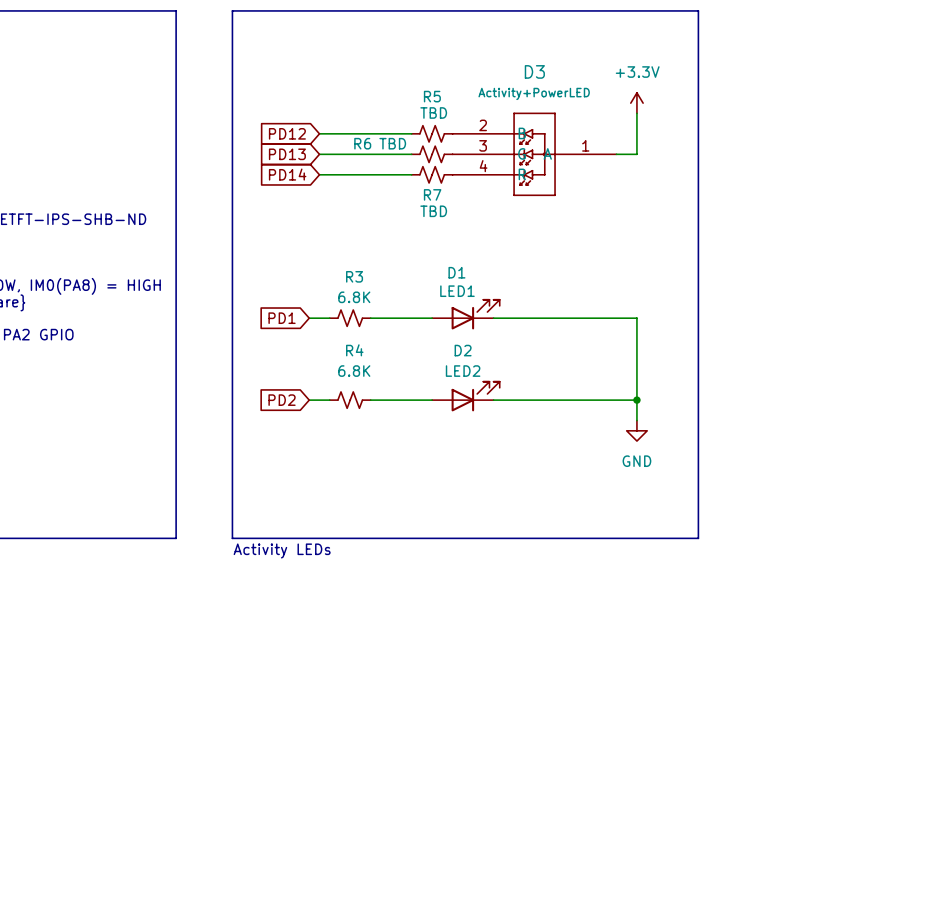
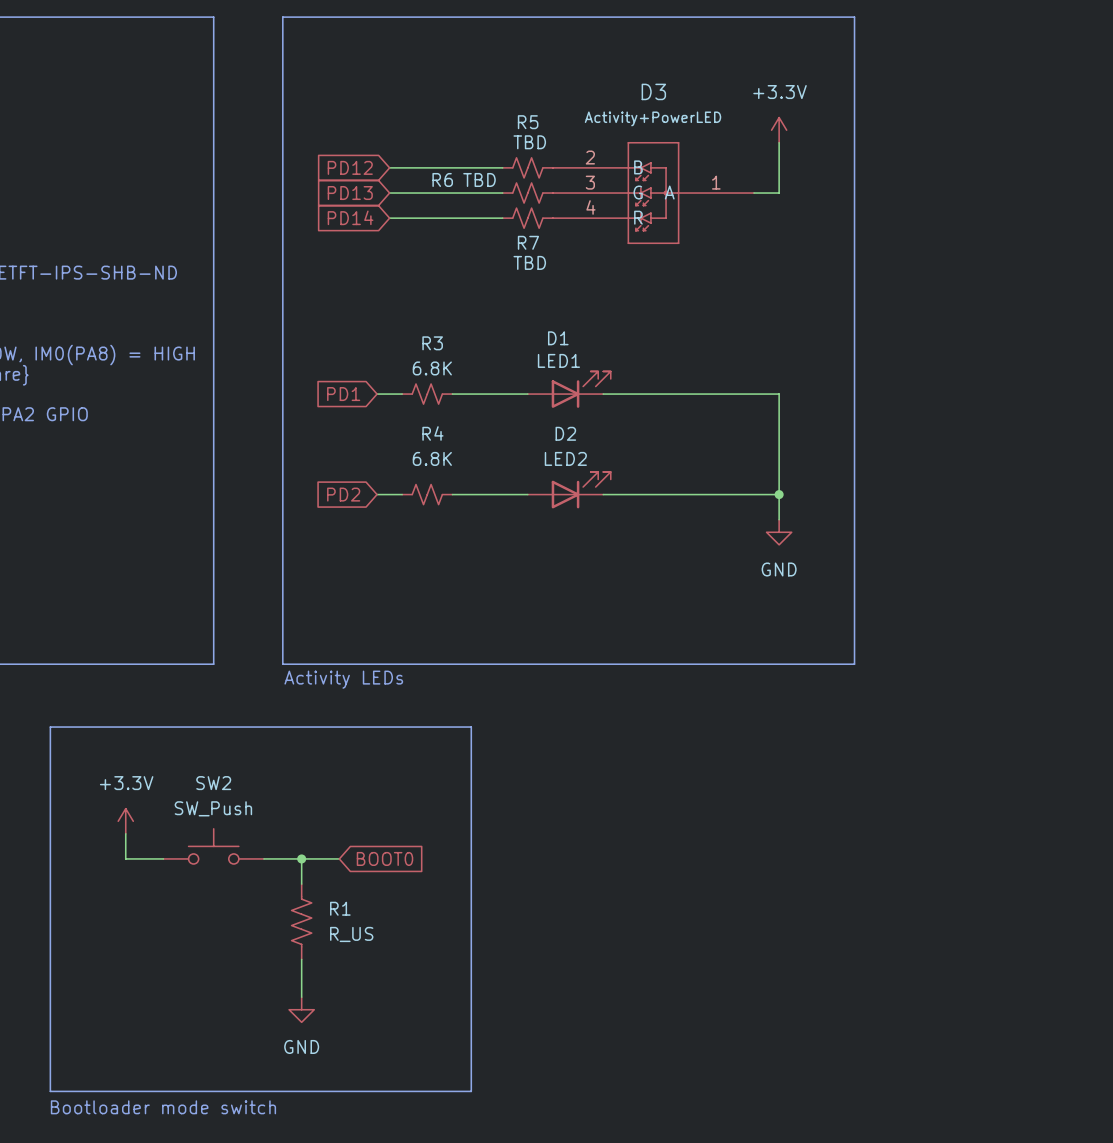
line: none -> (50, 727) (471, 727) (471, 1091) (50, 1091) (50, 727)
power symbol: none -> +3.3V (125, 821)
wire: none -> (125, 833) (125, 858) (163, 858)
SW2: none -> SW_Push (213, 846)
wire: none -> (263, 858) (339, 858)
wire: none -> (301, 858) (301, 884)
junction: none -> (301, 858)
global label: none -> BOOT0 (385, 858)
R1: none -> R_US (301, 921)
wire: none -> (301, 959) (301, 997)
power symbol: none -> GND (301, 1009)
text: none -> Bootloader mode switch (163, 1107)

